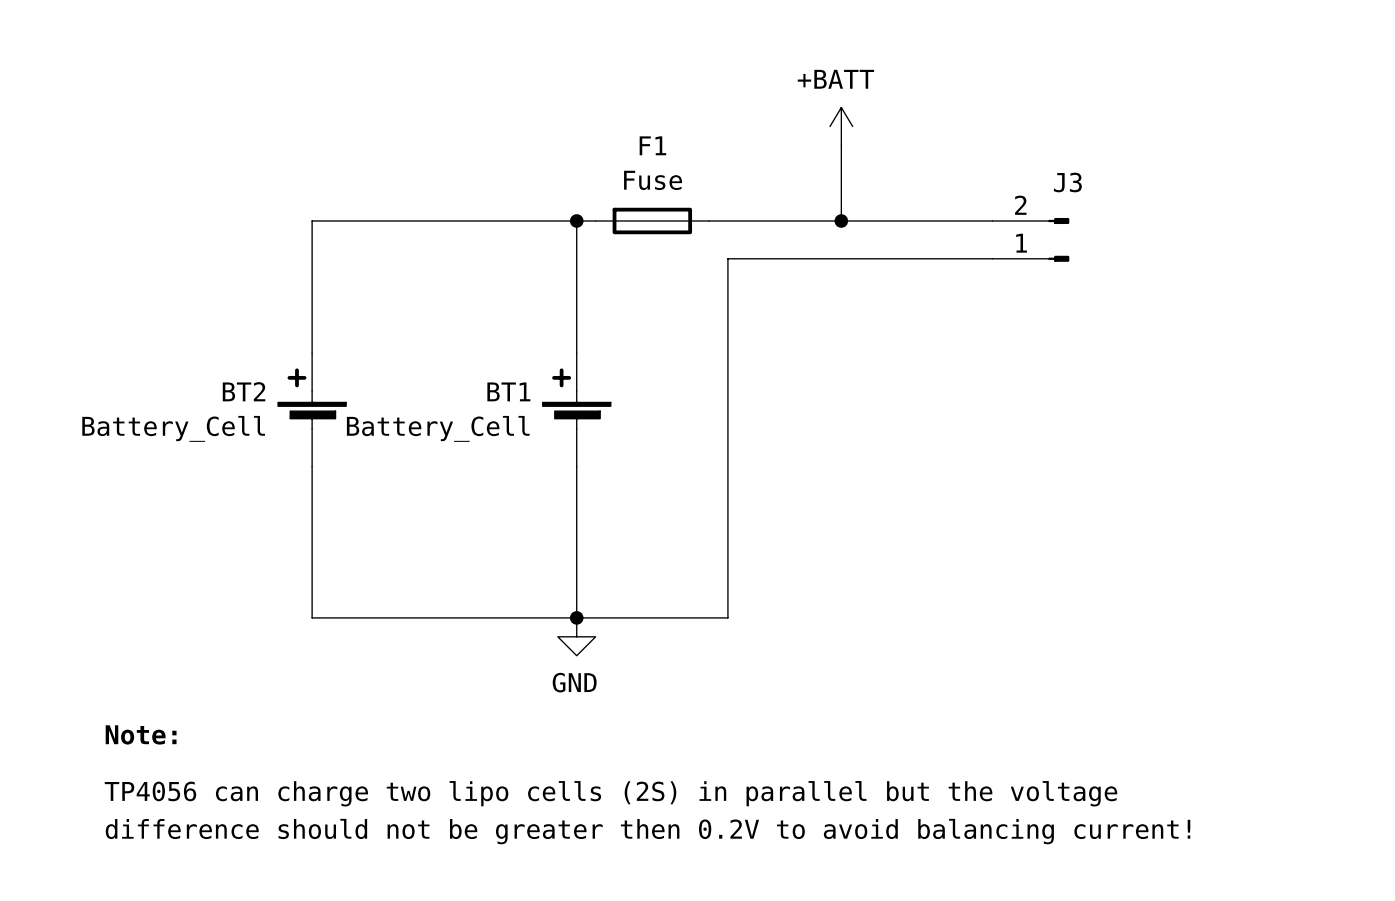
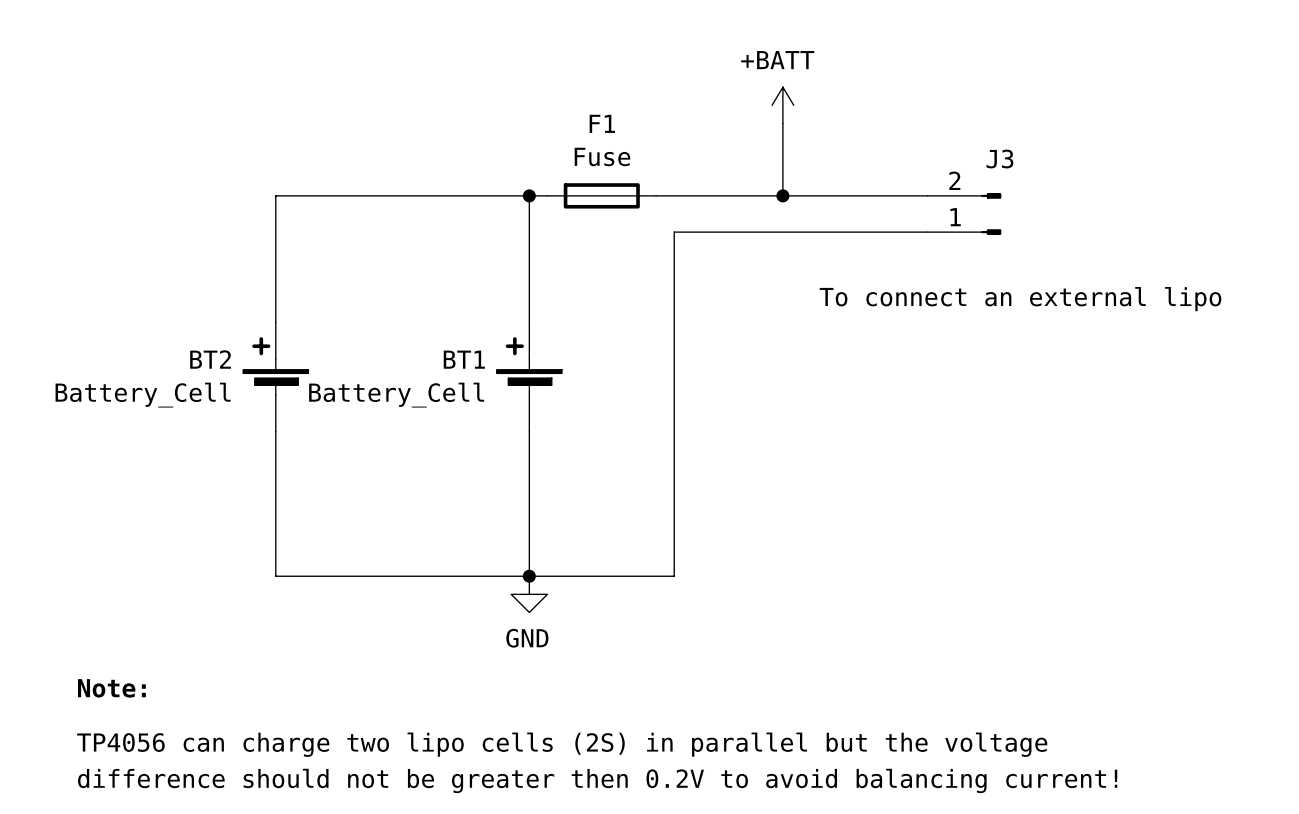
text: none -> To connect an external lipo (1020, 299)

